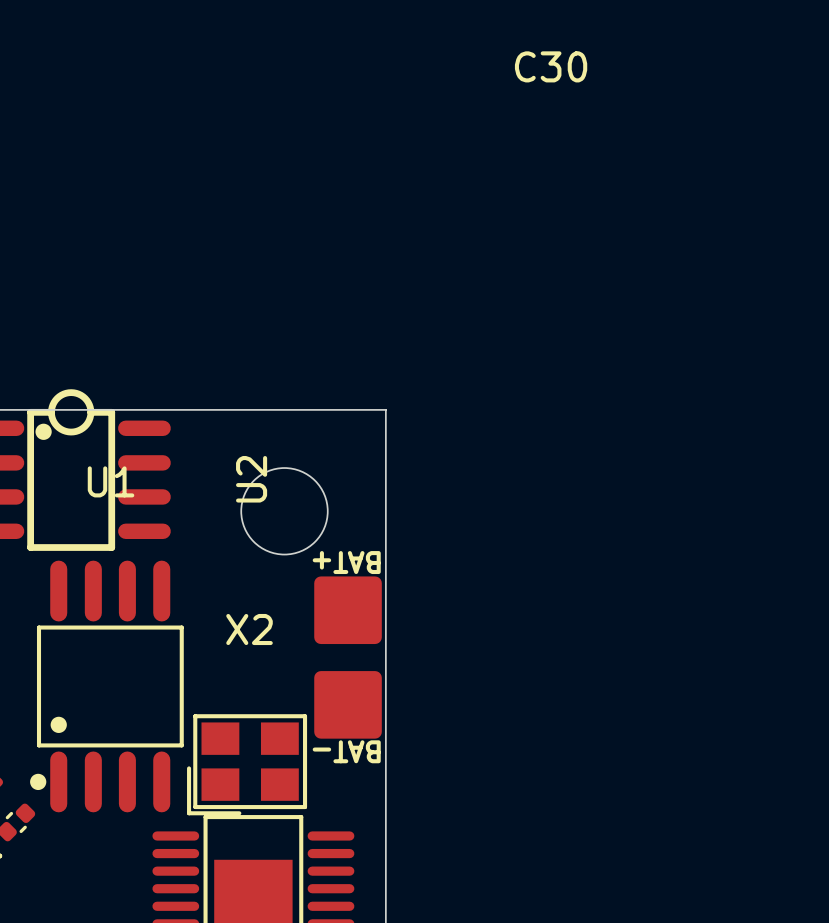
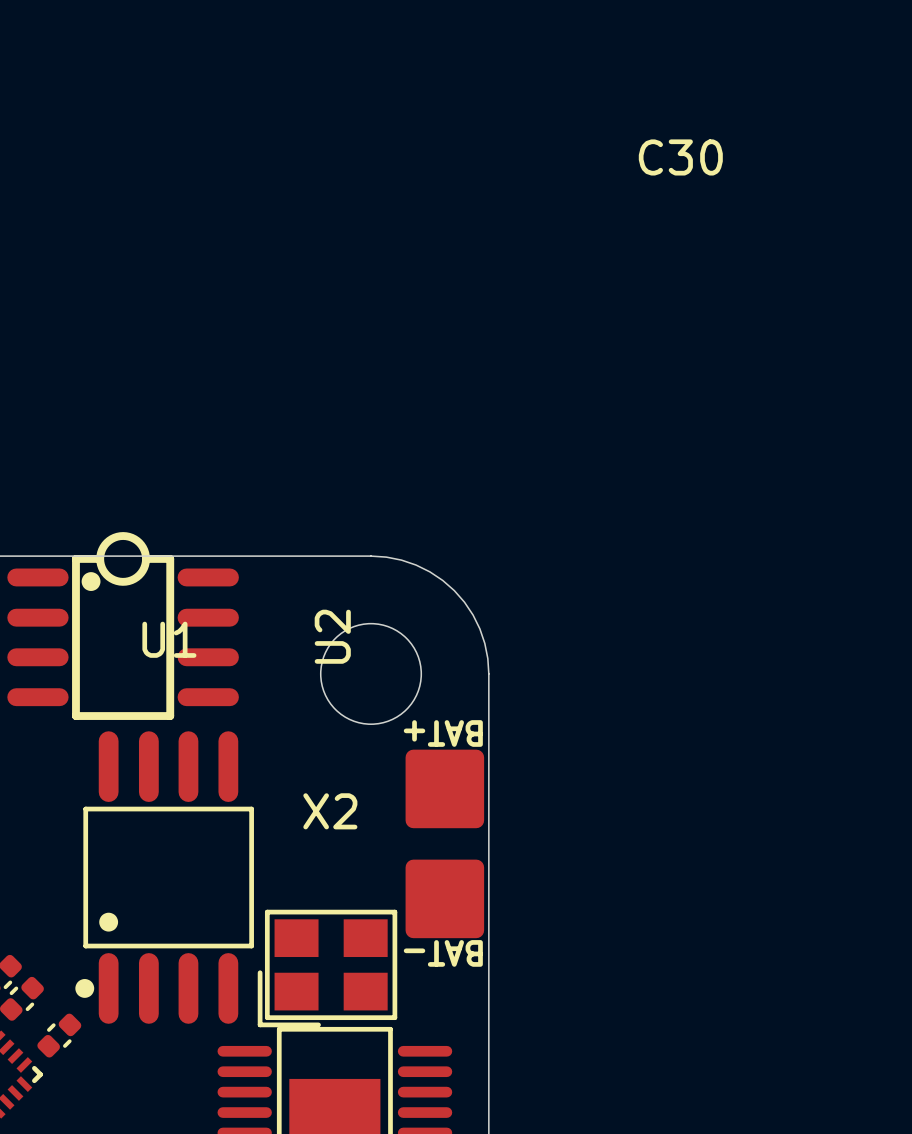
board edge: (284, 409) (385, 409) (385, 511) -> (371, 556) (386, 557) (416, 565) (429, 571) (454, 590) (464, 602) (479, 628) (484, 643) (488, 673)

